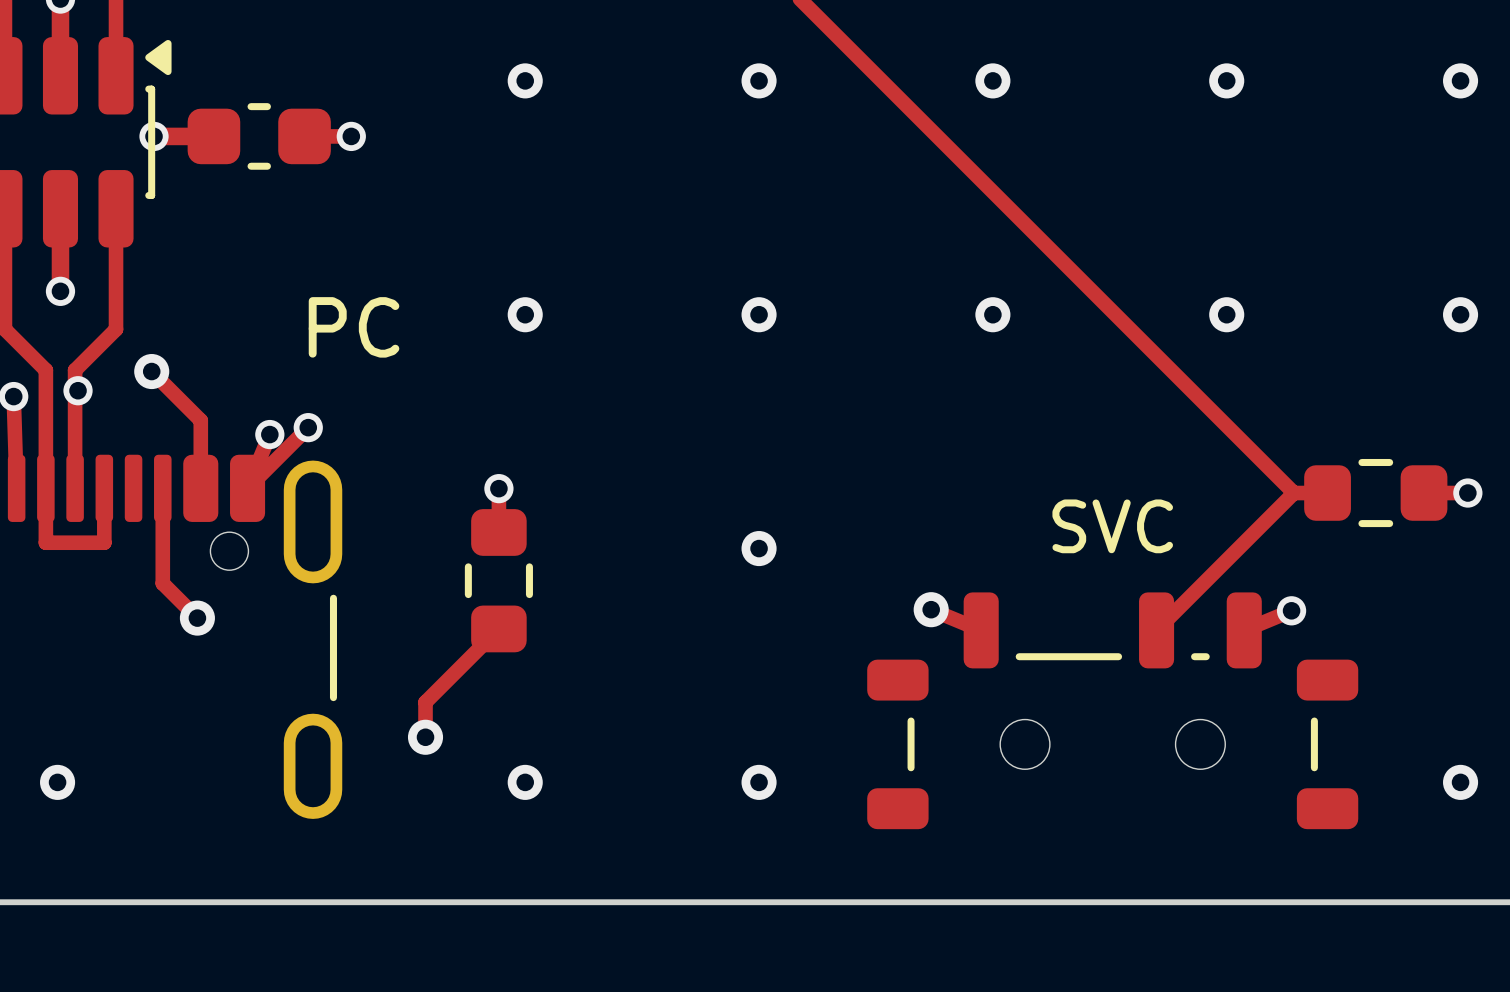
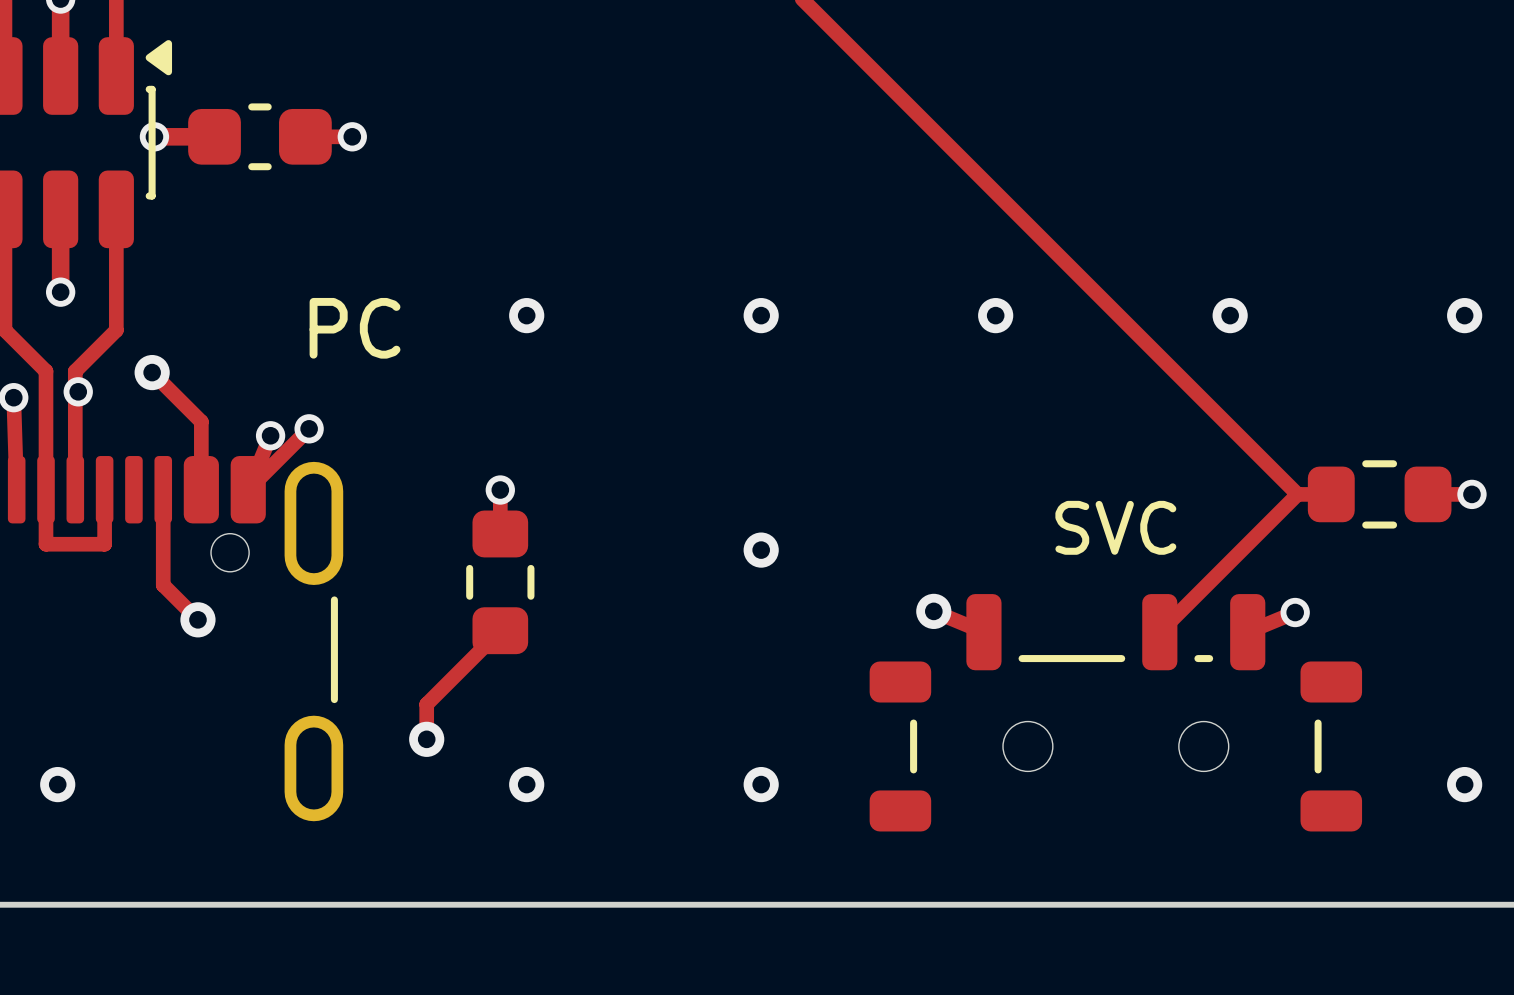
via: (525, 80) -> none
via: (759, 80) -> none
via: (992, 80) -> none
via: (1226, 80) -> none
via: (1460, 80) -> none

